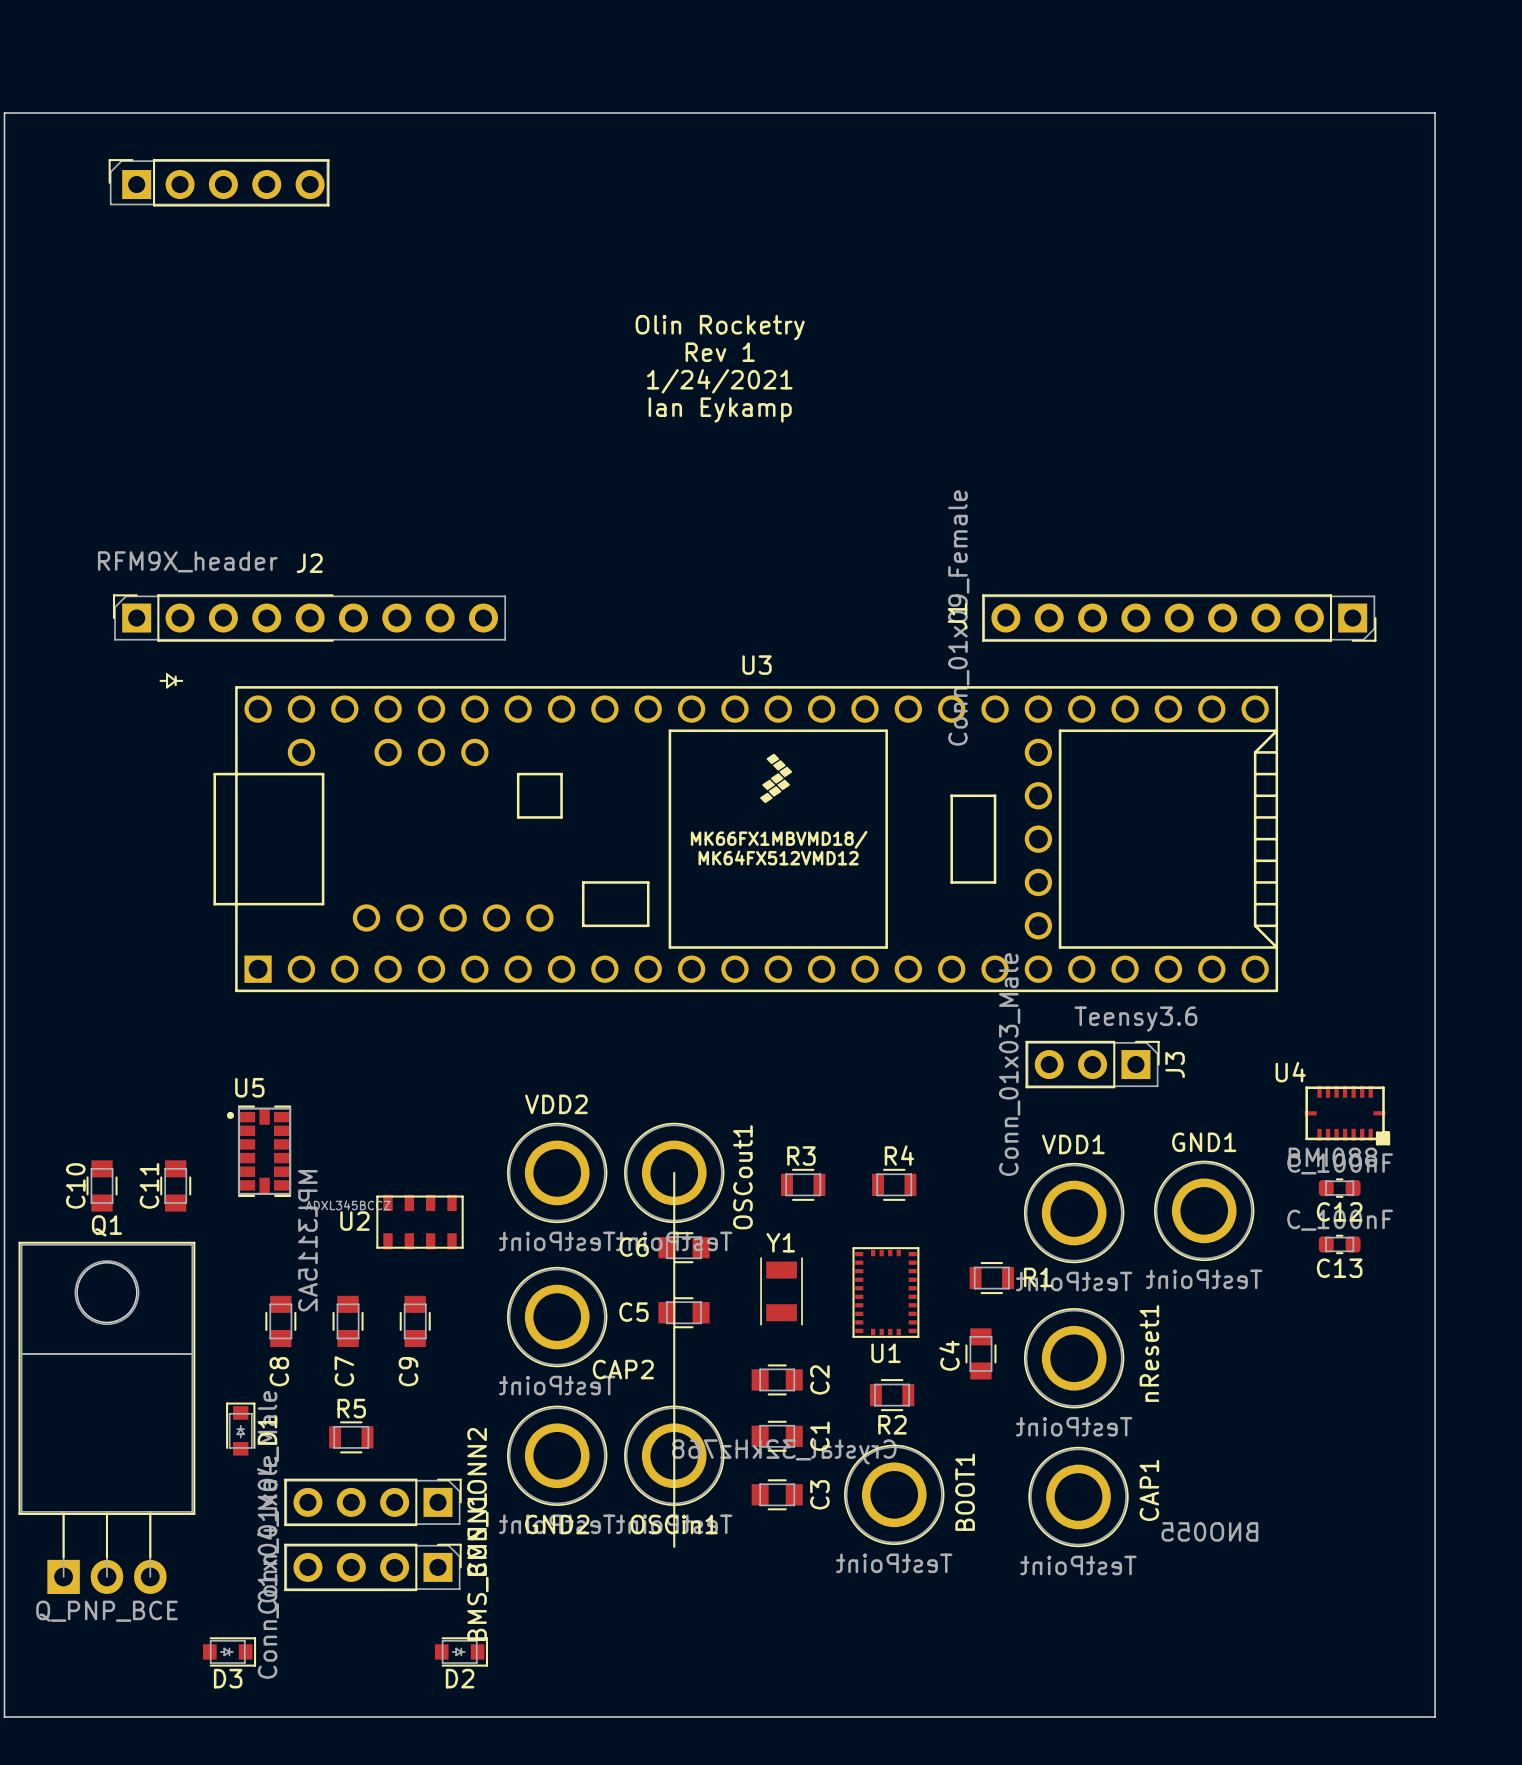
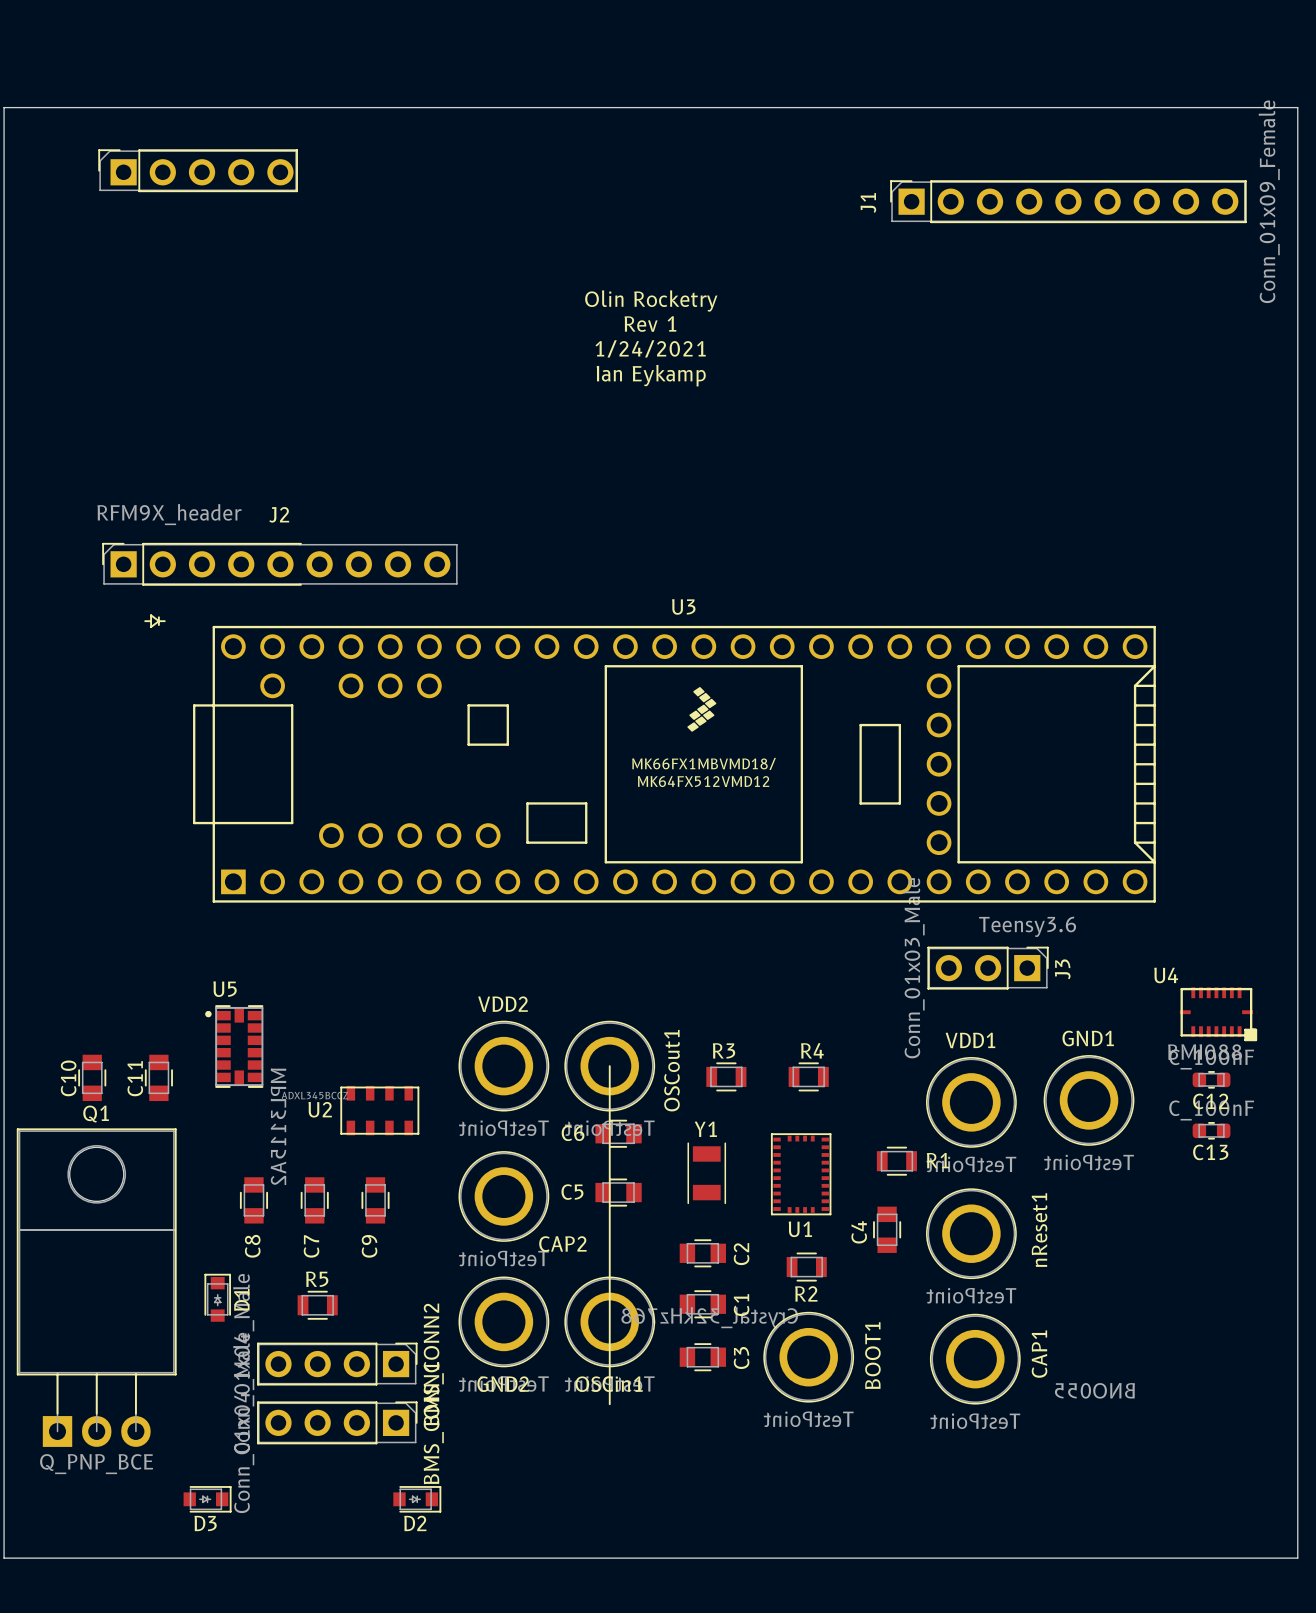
J1 rotation: 0° (1179, 618) -> 180° (1068, 201)
J1 position: (1179, 618) -> (1068, 201)

